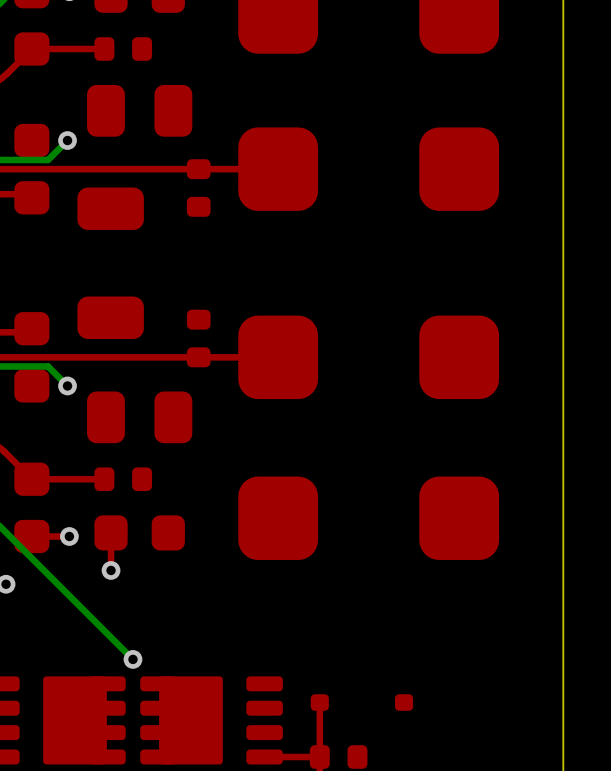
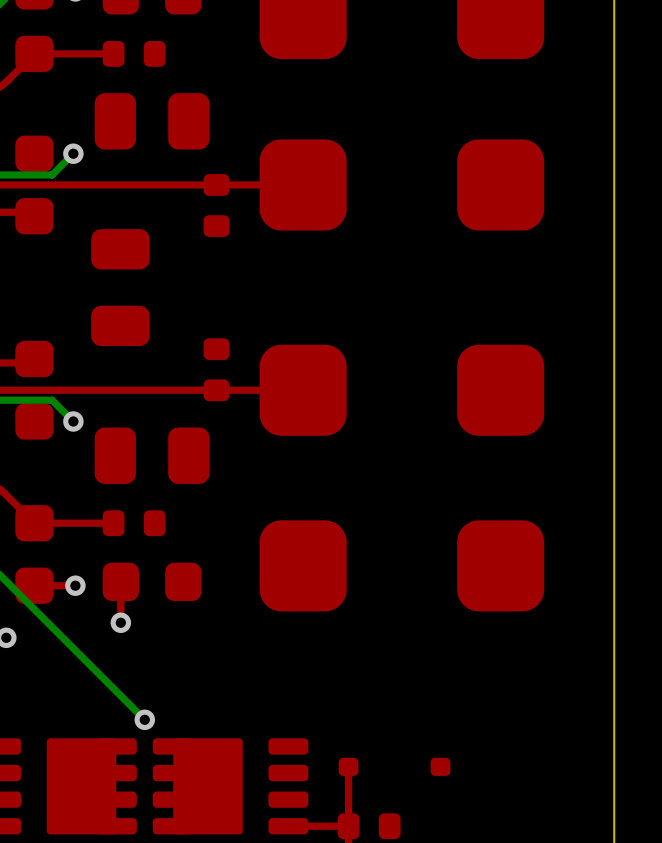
part footprint: [77, 187, 144, 339] -> [91, 229, 150, 347]

